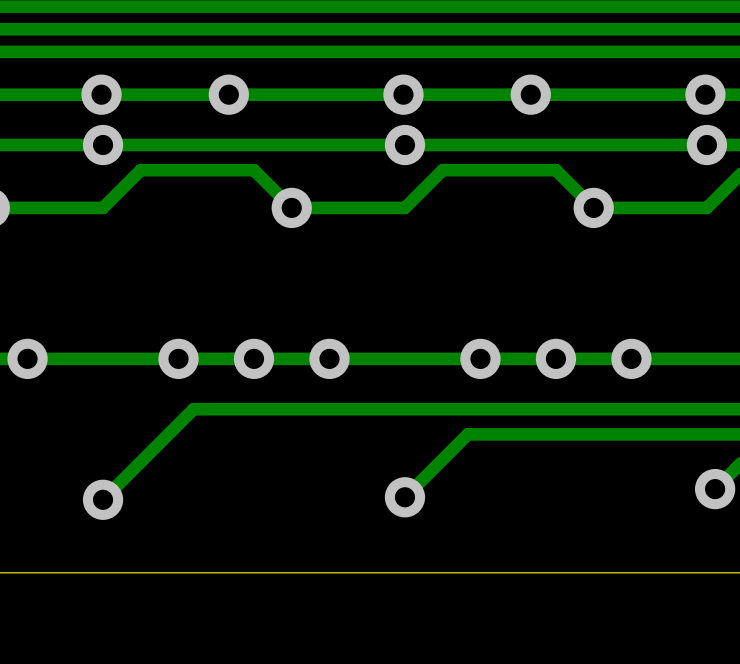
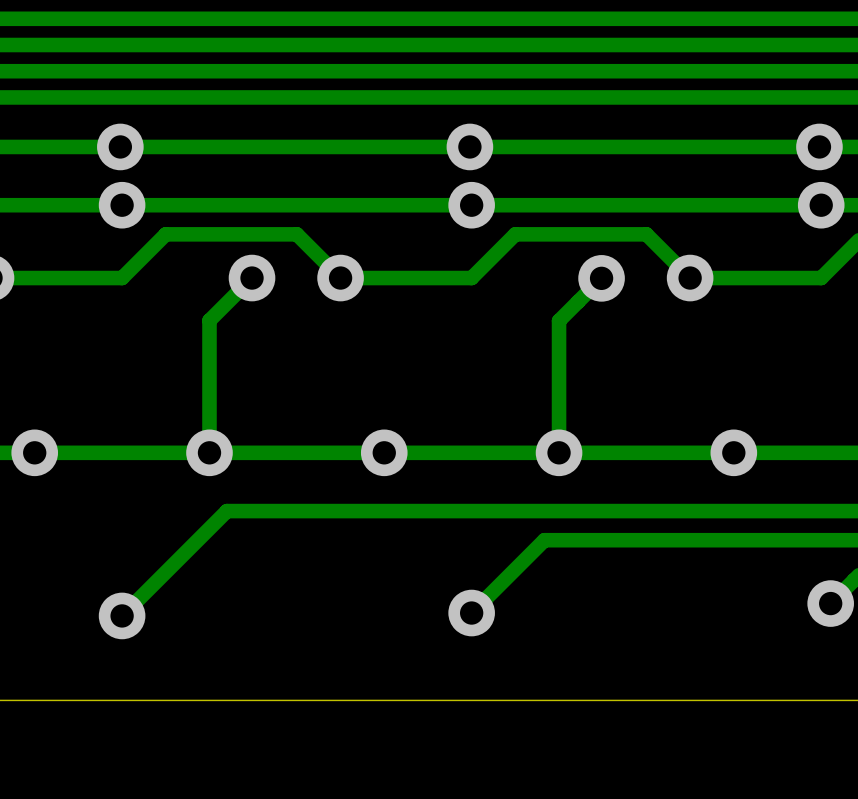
via: (228, 94) -> none
via: (530, 94) -> none
track: none -> (252, 278) (209, 320) (209, 452)
via: none -> (252, 278)
track: none -> (601, 278) (559, 320) (559, 452)
via: none -> (601, 278)
via: (254, 358) -> none
via: (555, 358) -> none

